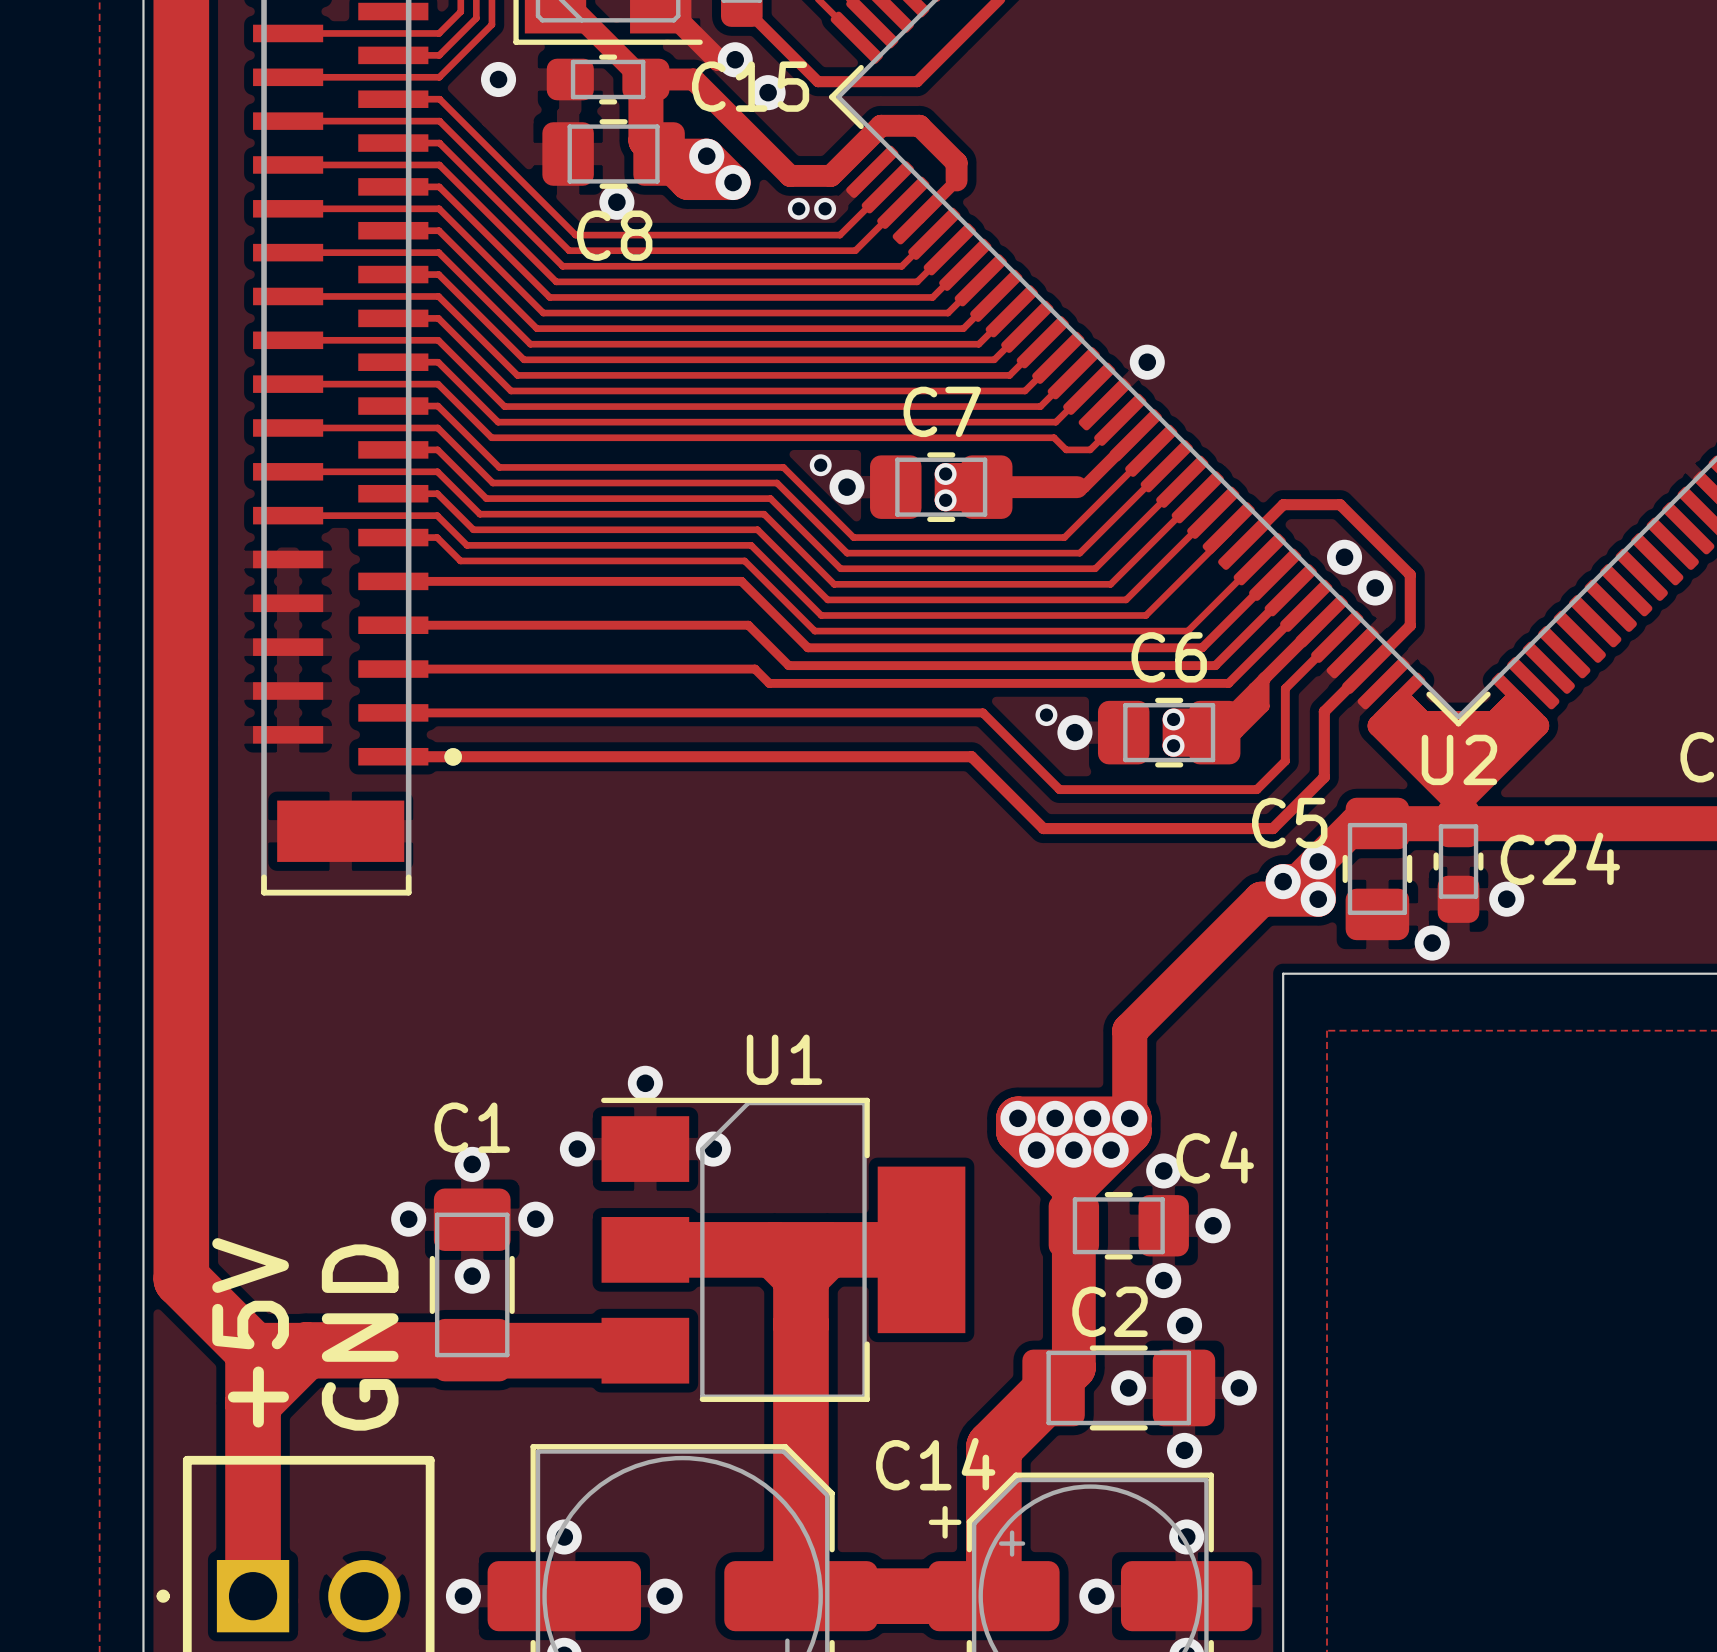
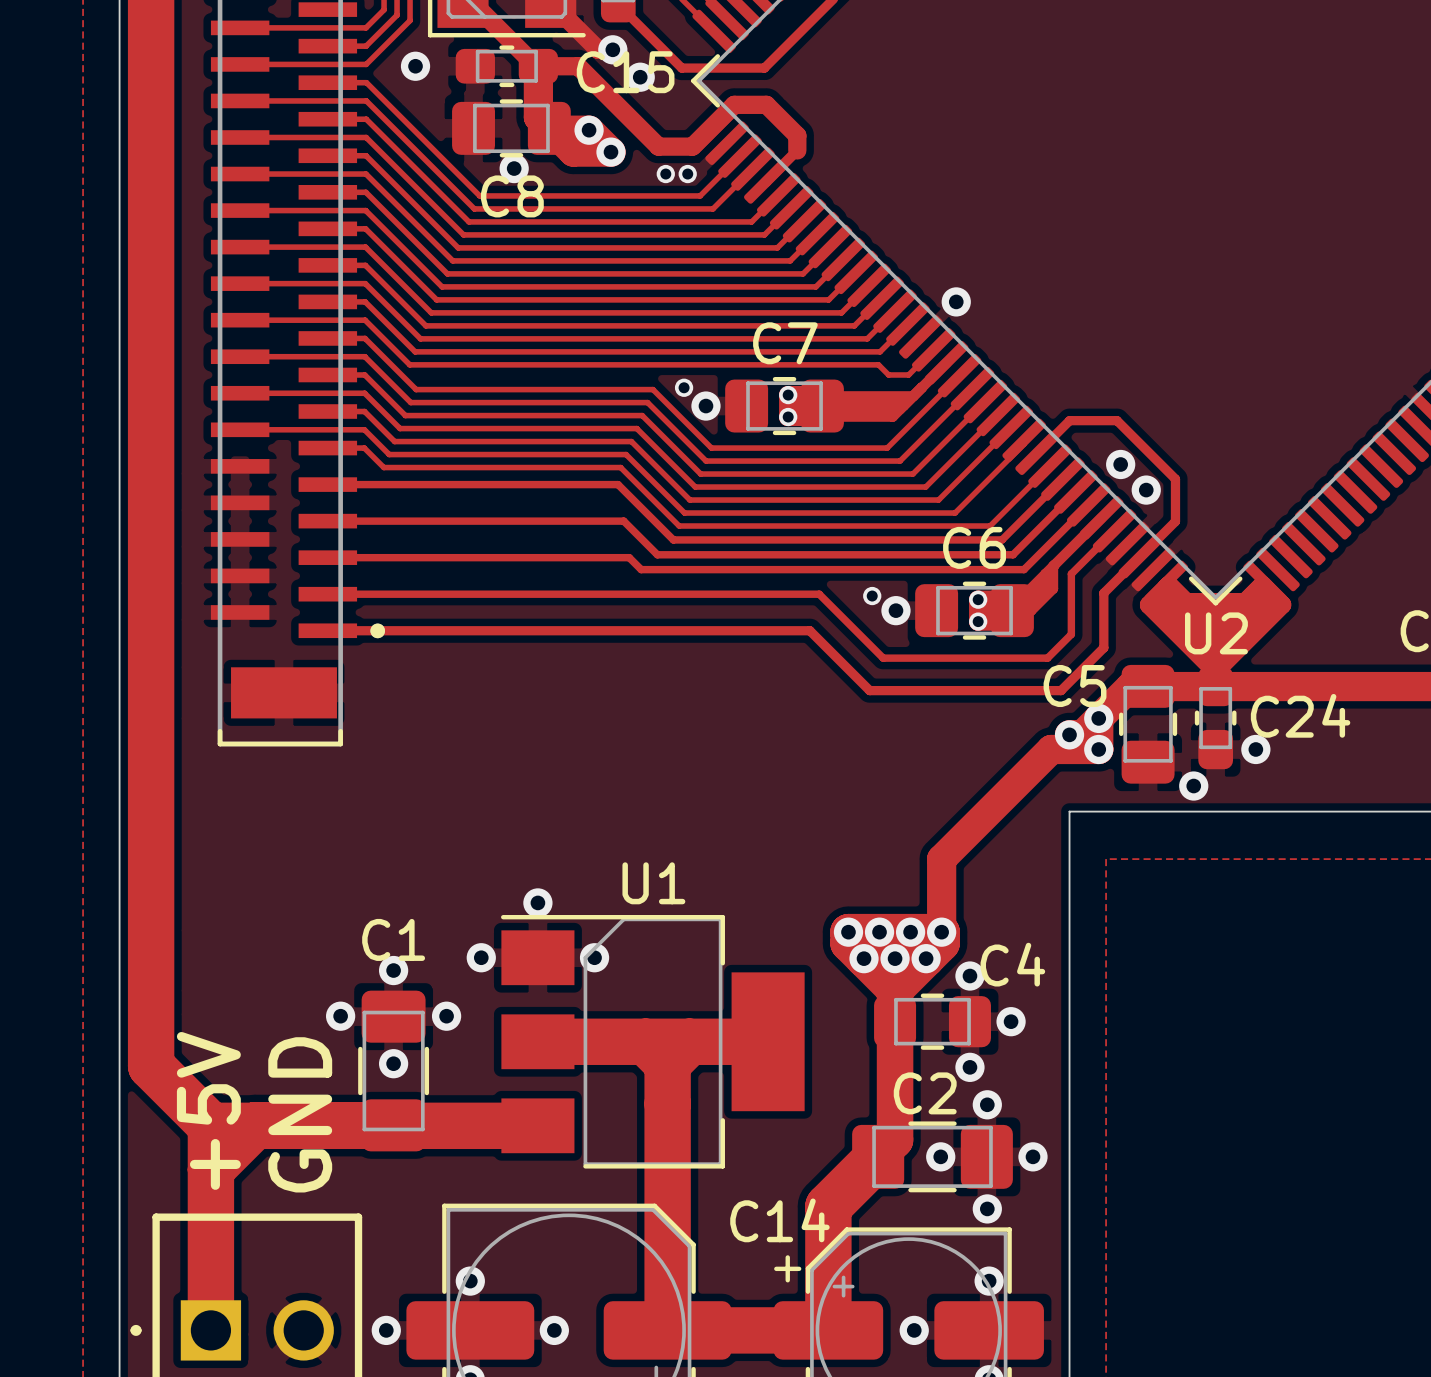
track: none -> (913, 396) (840, 396) (830, 406) (822, 406) (832, 416) (892, 416) (903, 406)

